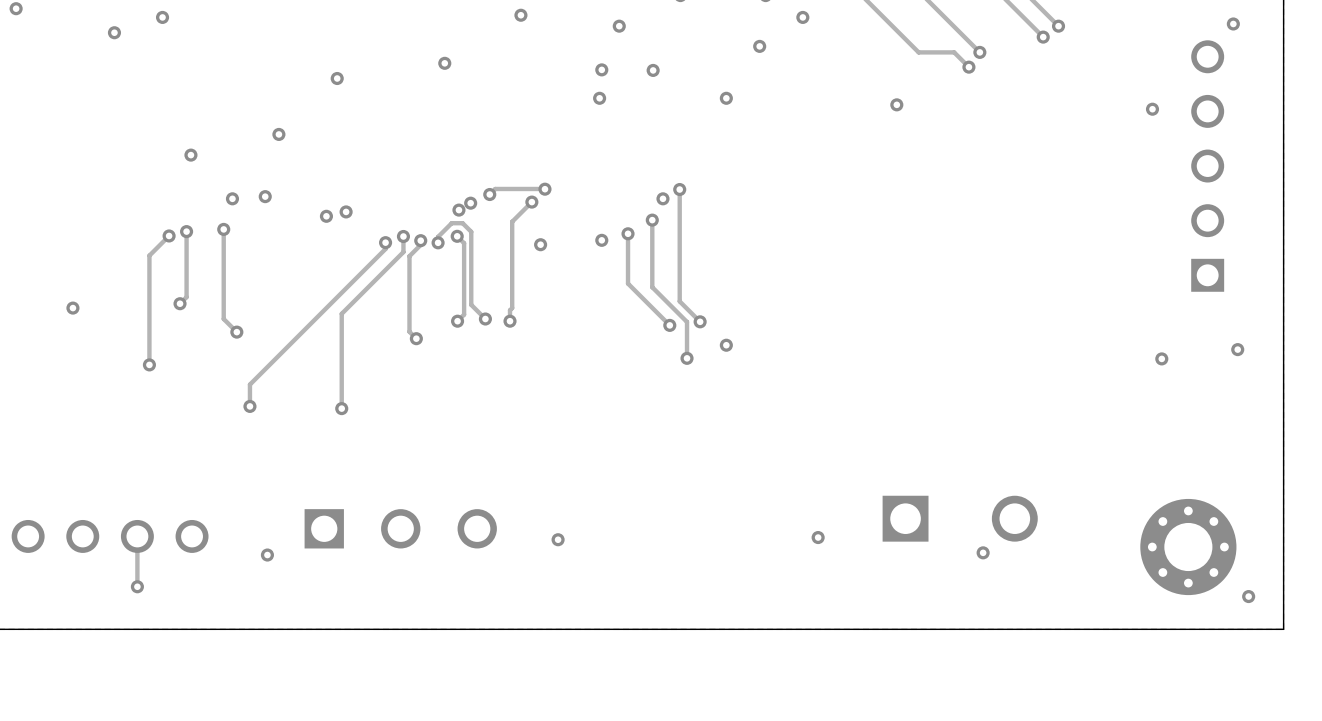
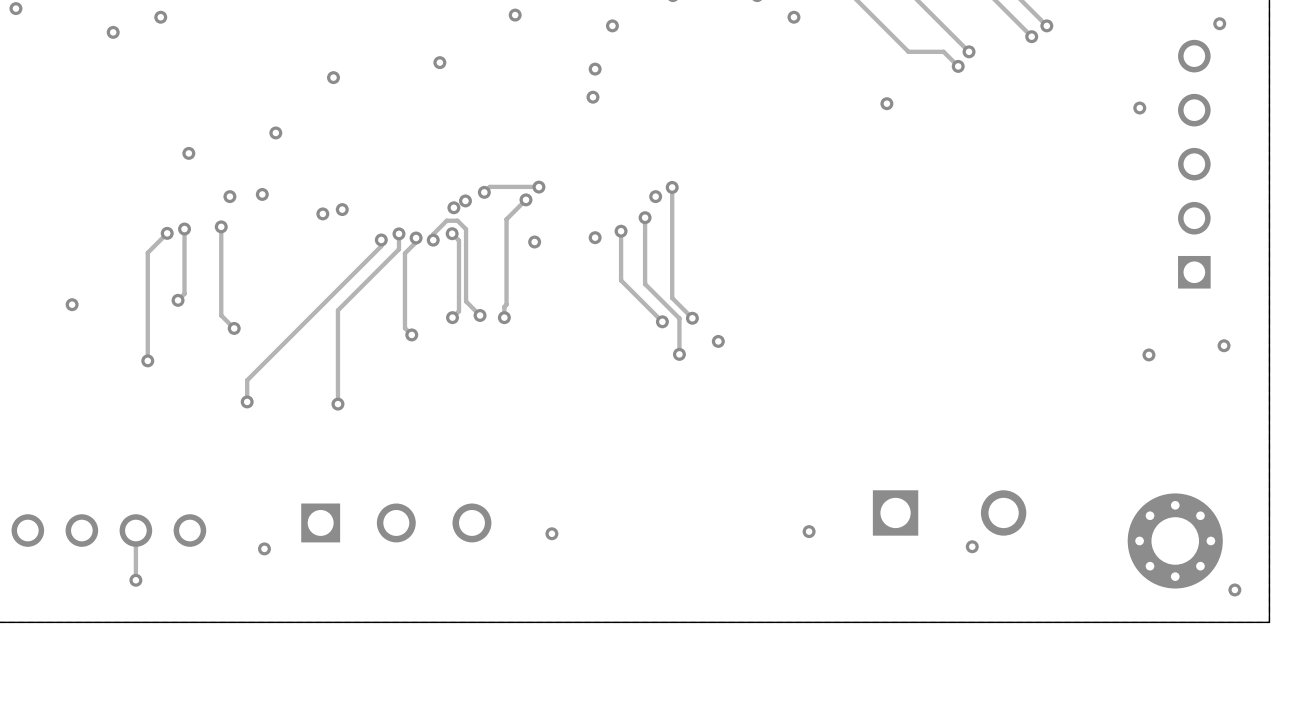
via: (759, 46) -> none
via: (653, 70) -> none
via: (726, 98) -> none

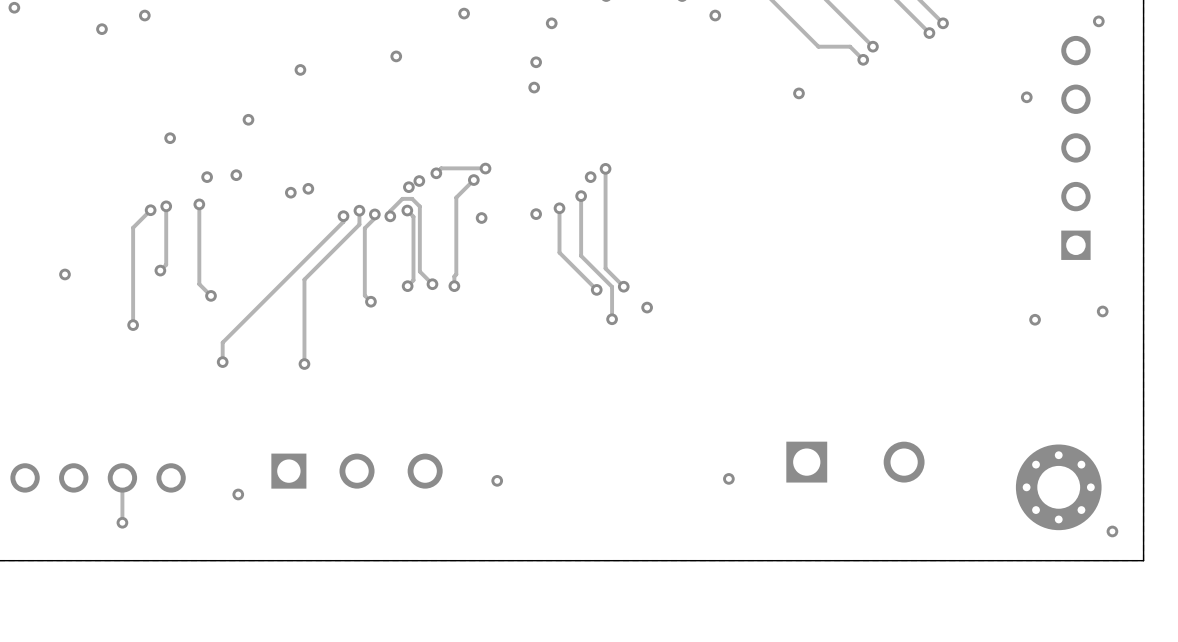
via: (972, 546) -> none

